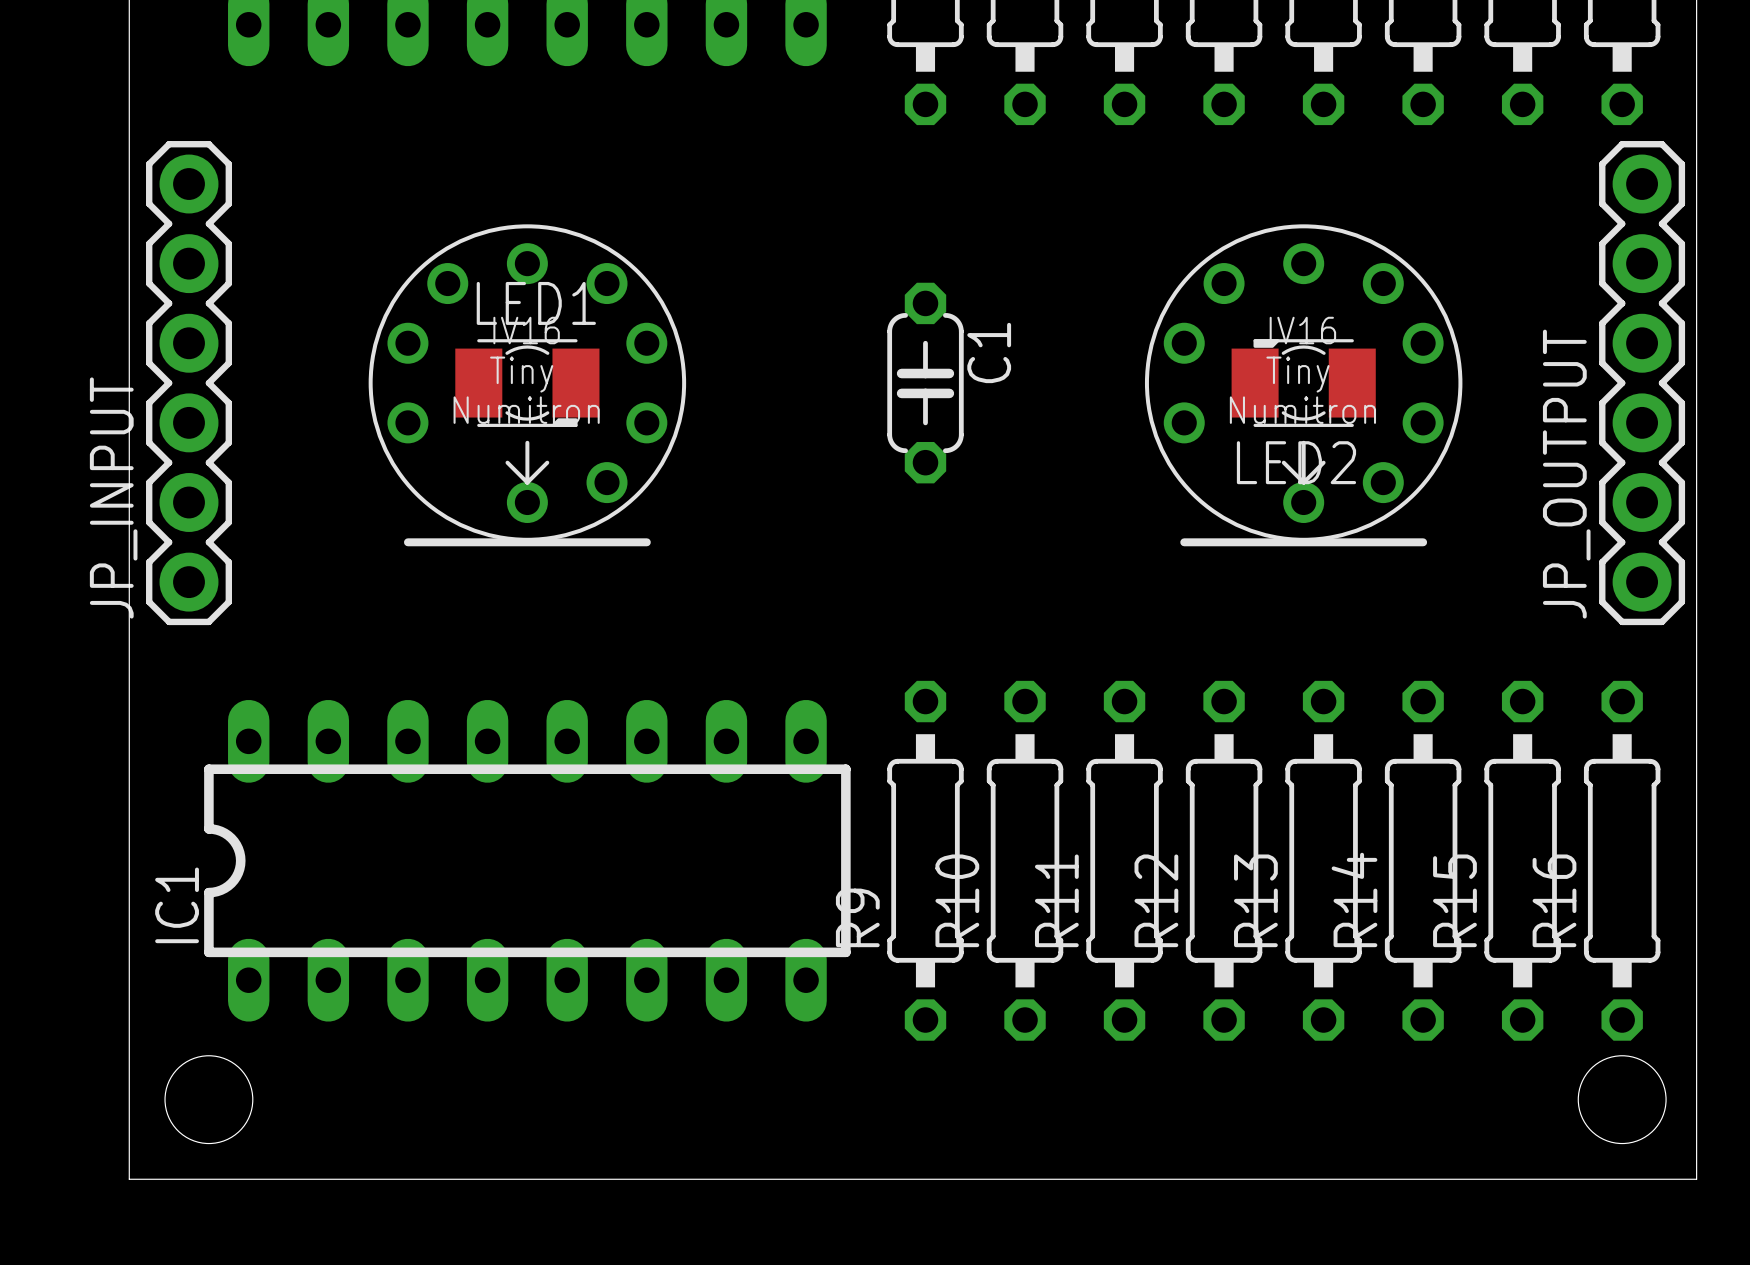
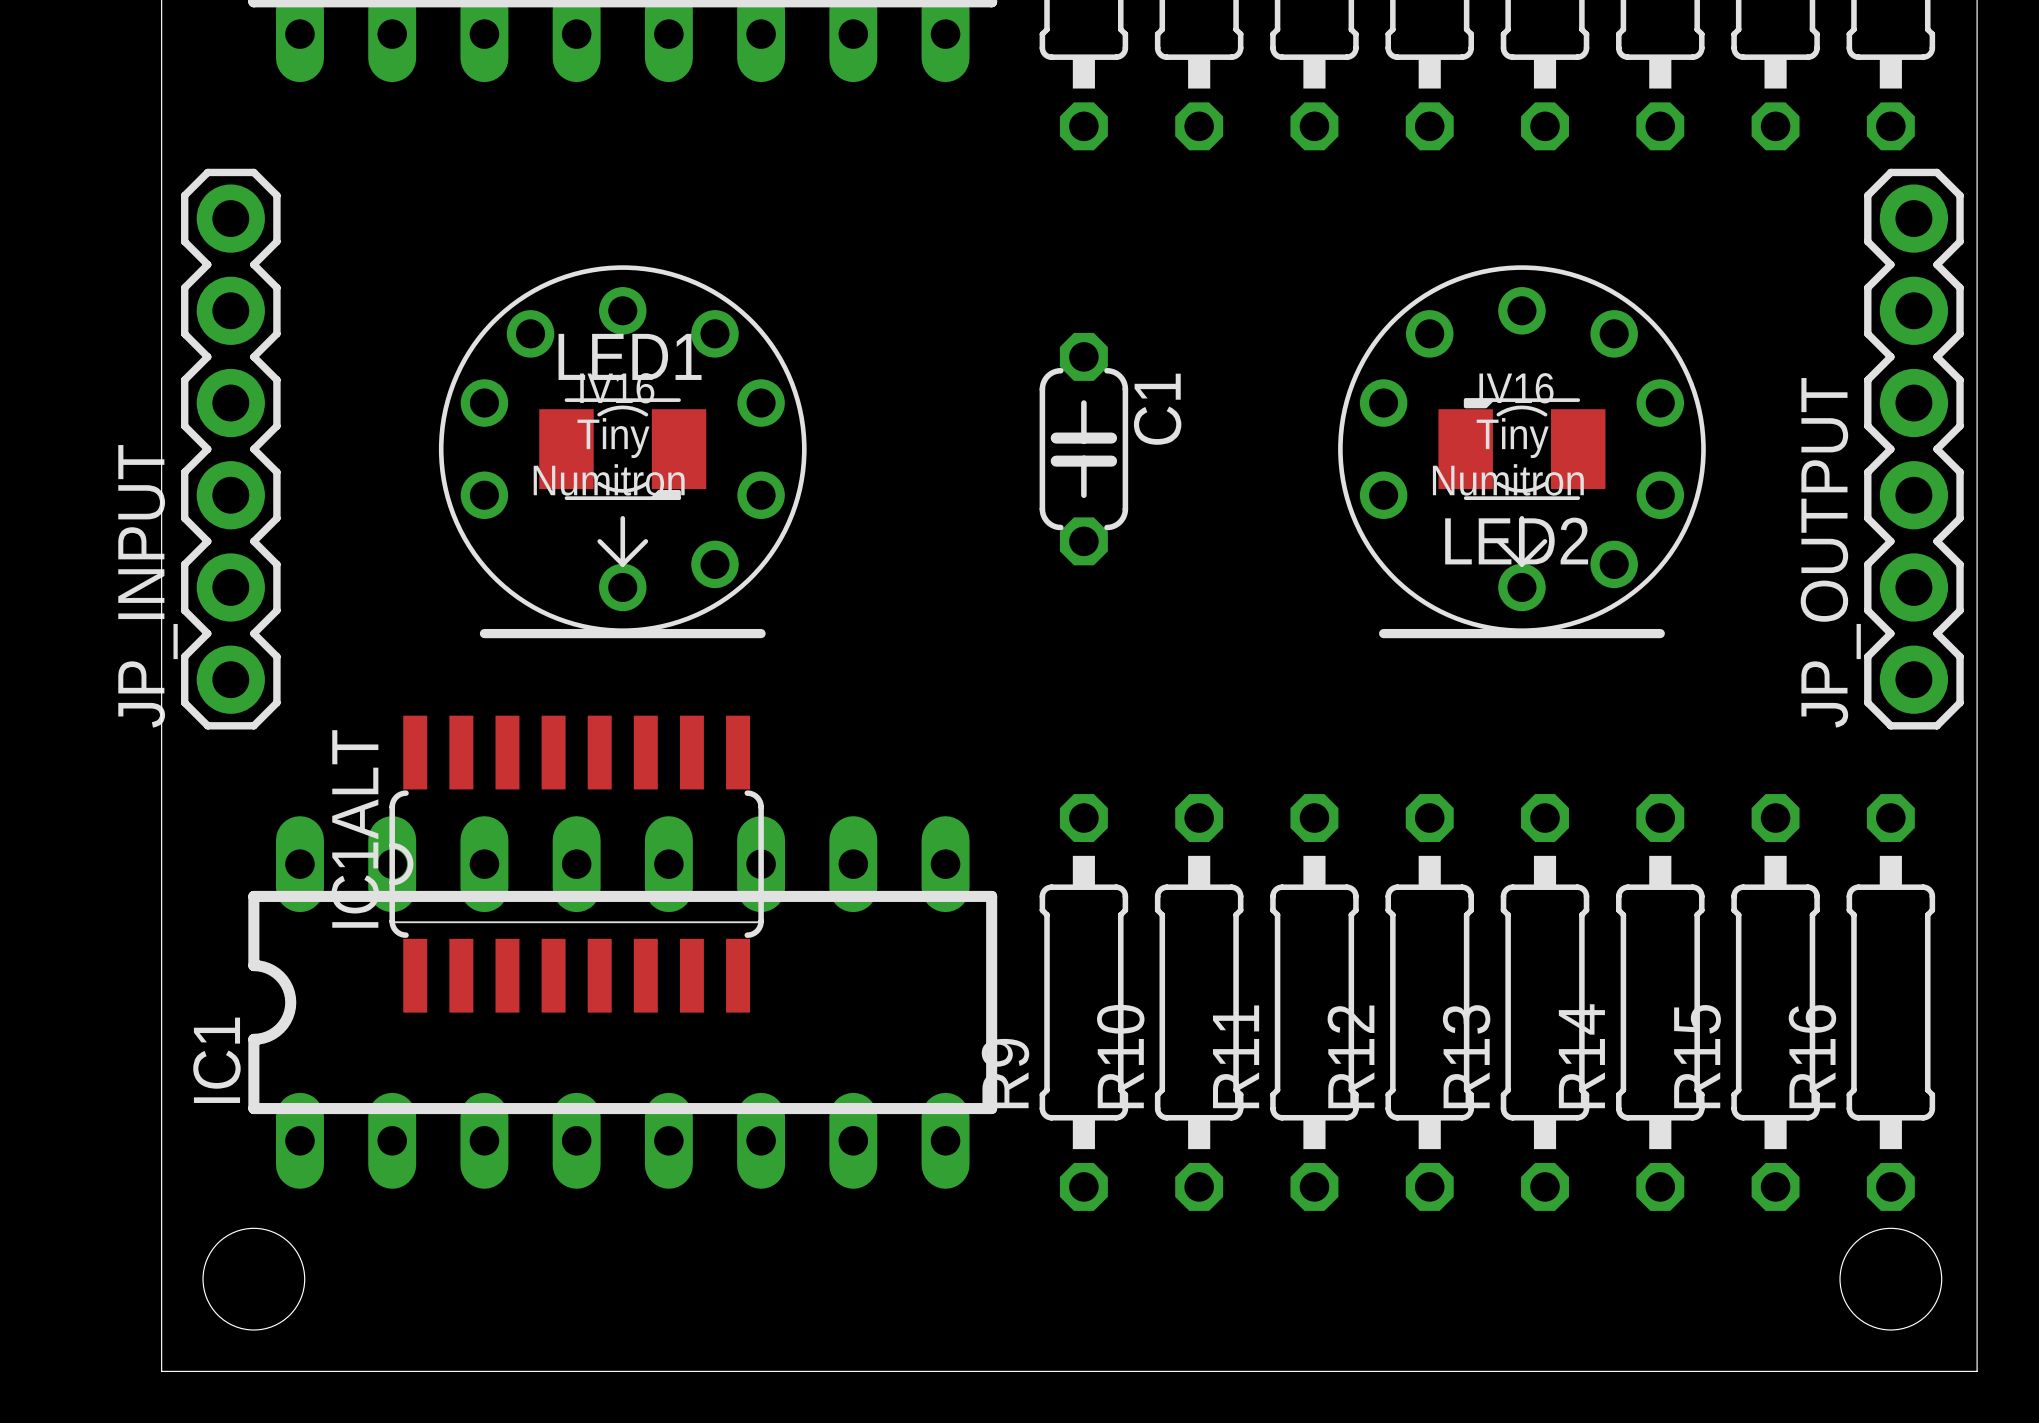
IC1ALT: none -> (576, 864)

